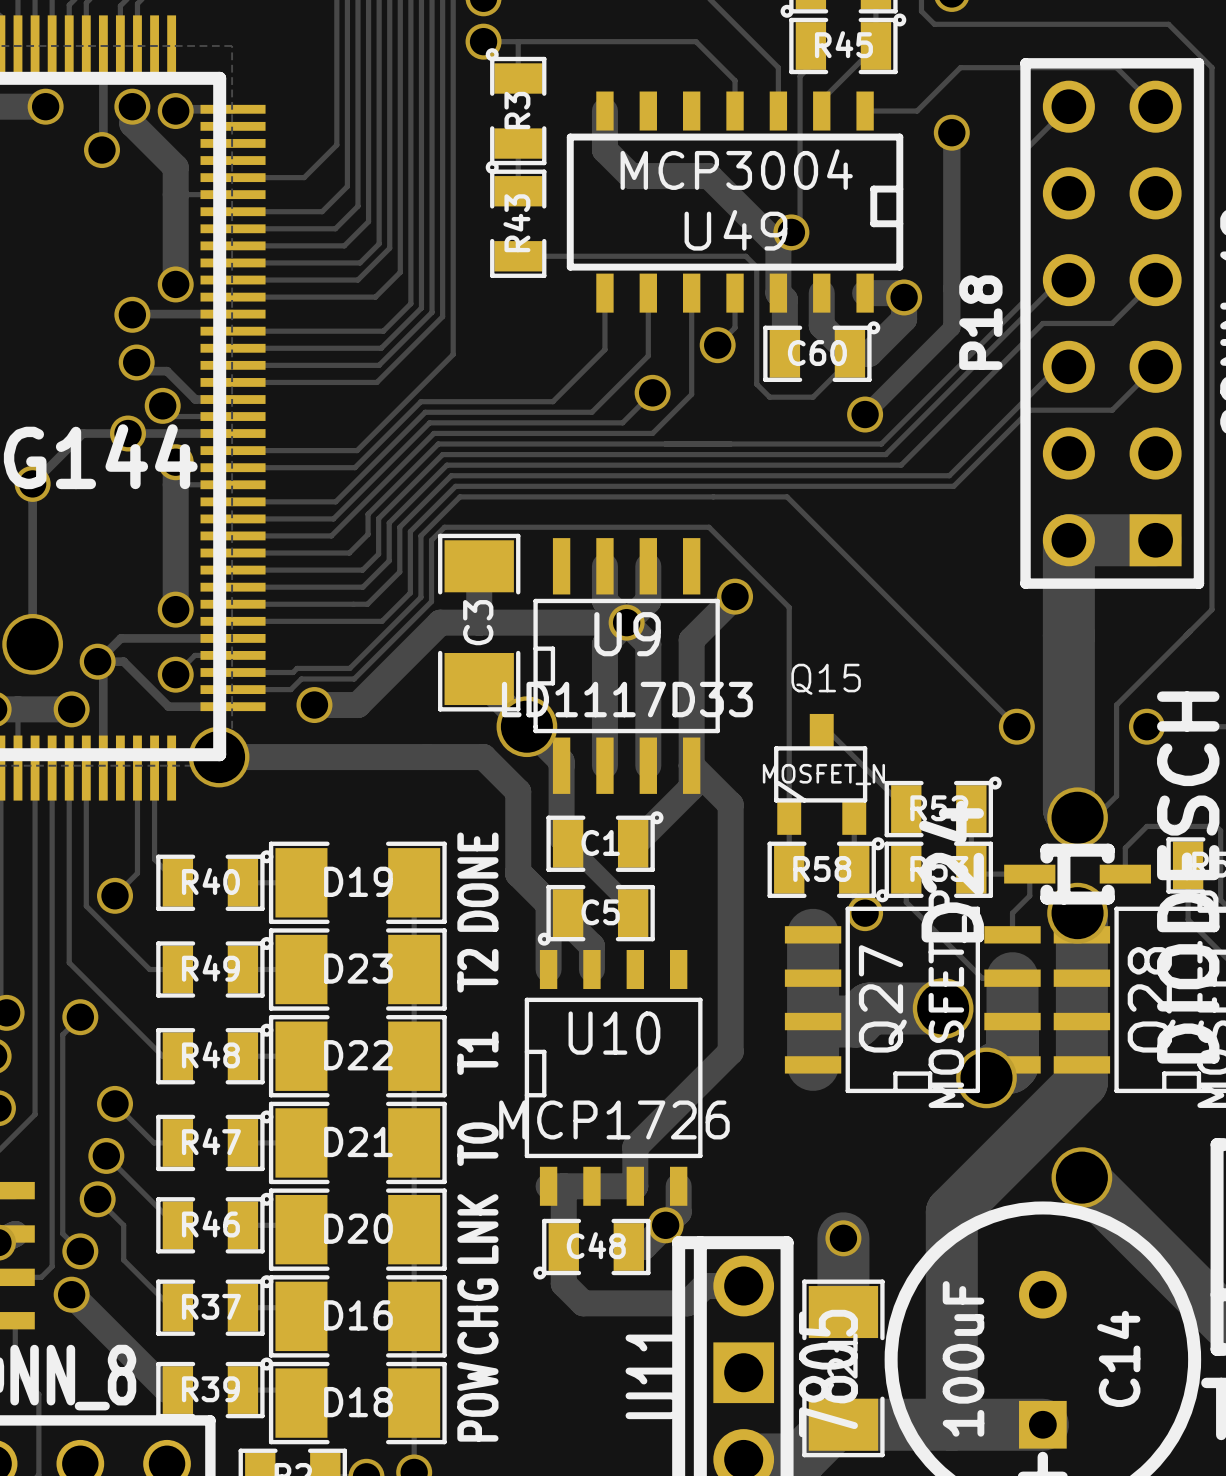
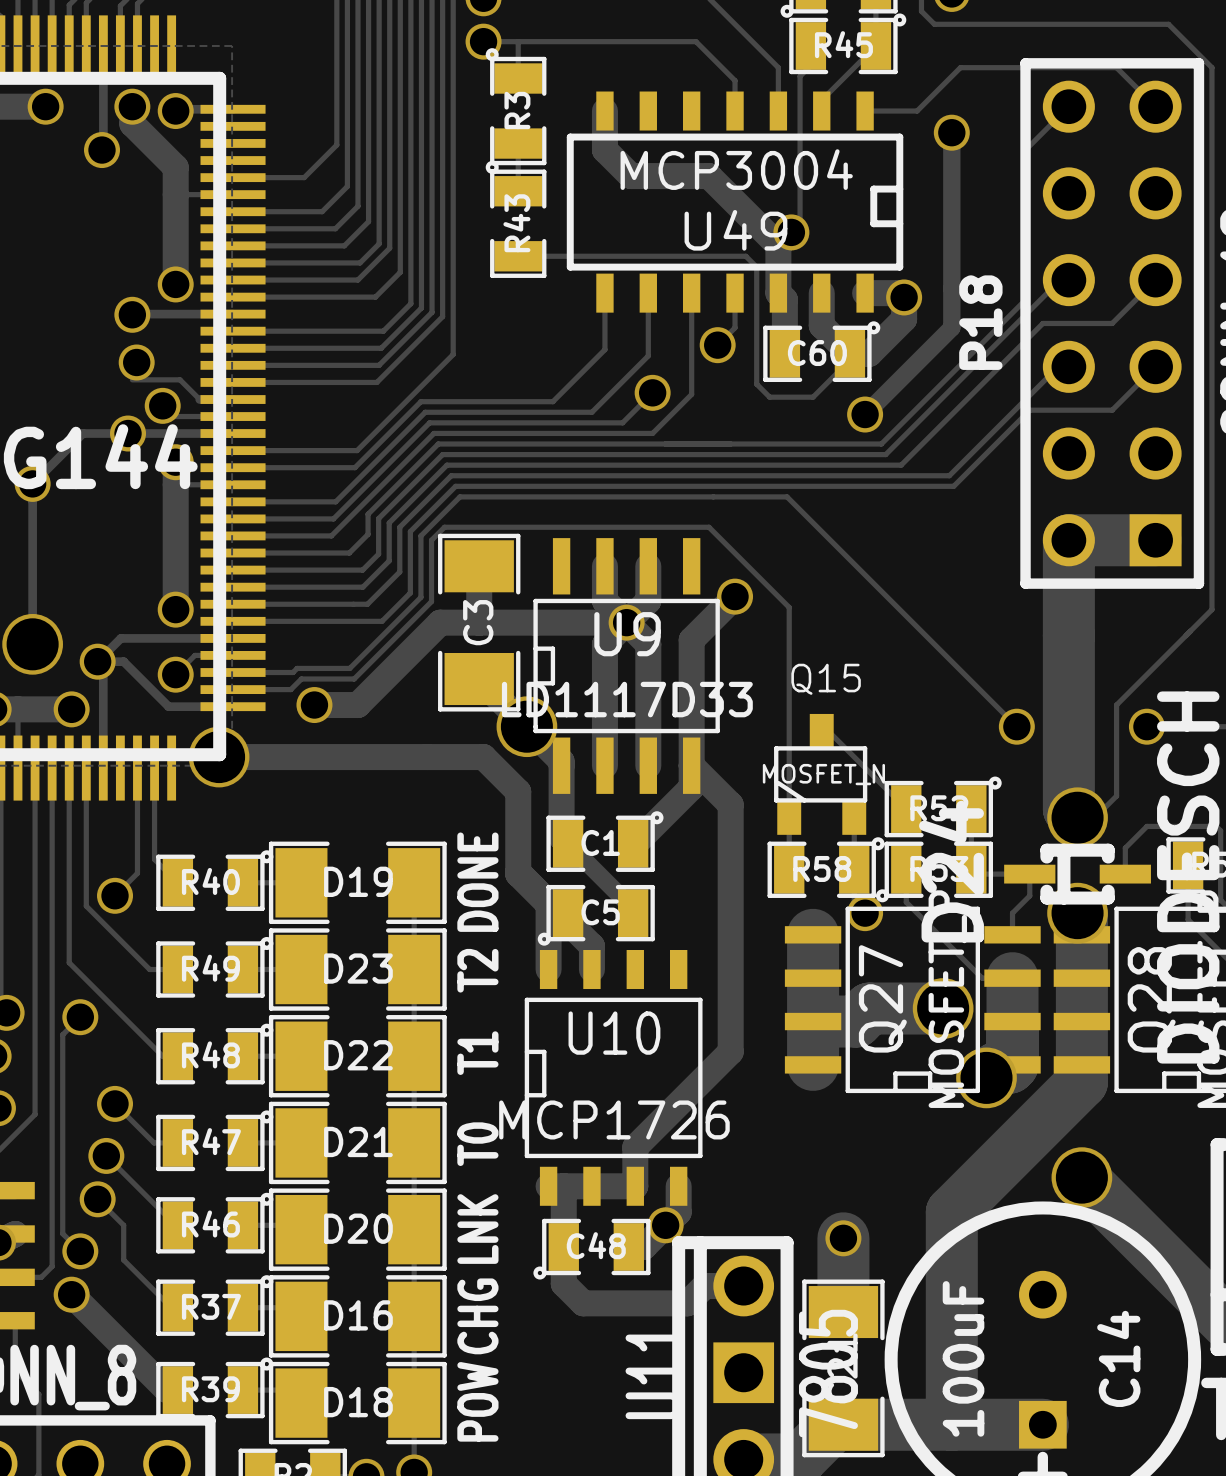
track: (136, 362) (145, 371) (167, 371) (195, 399) (199, 399) -> (132, 379) (180, 379) (199, 399)

